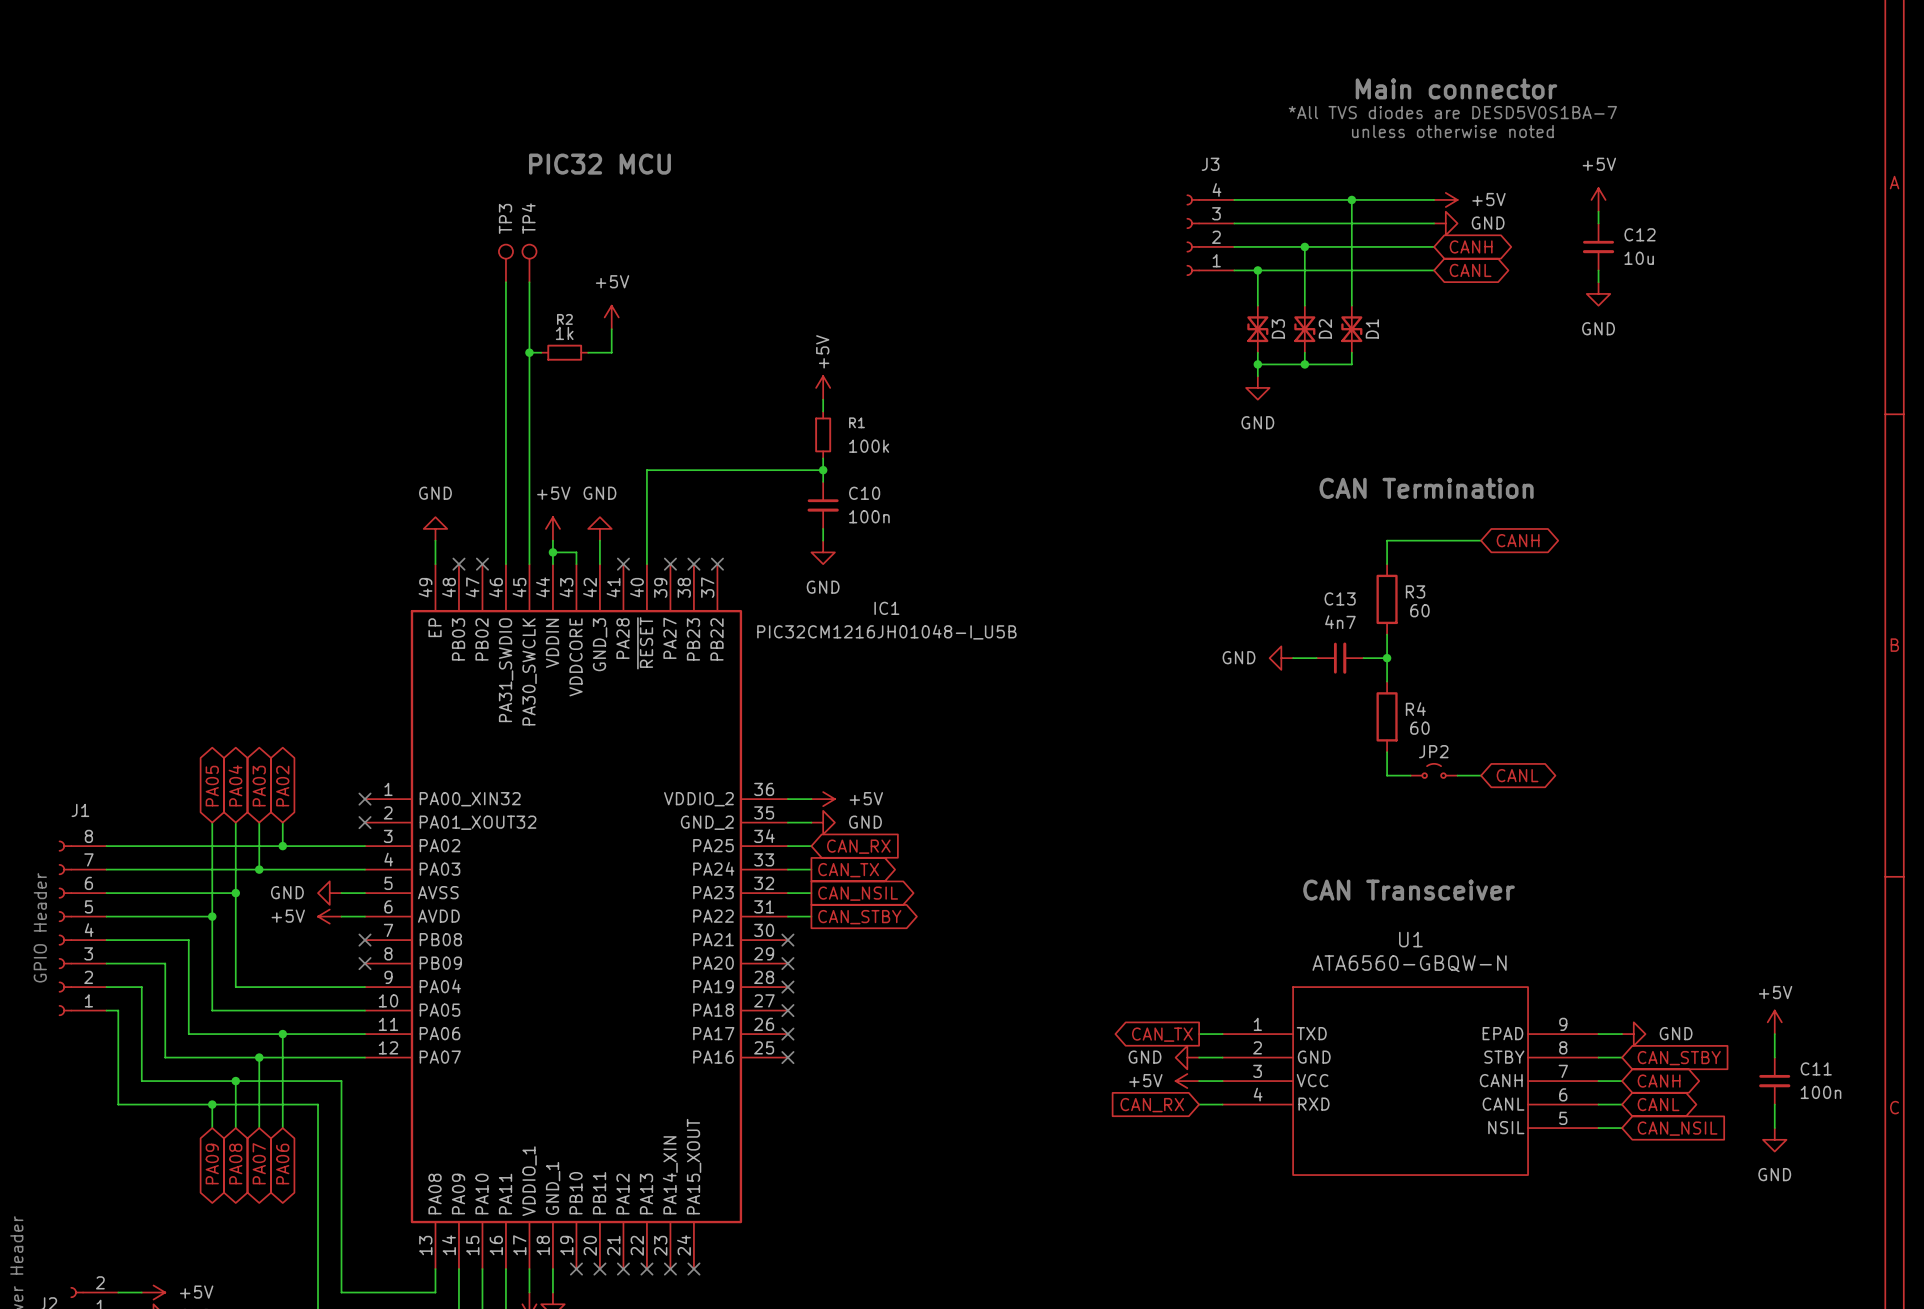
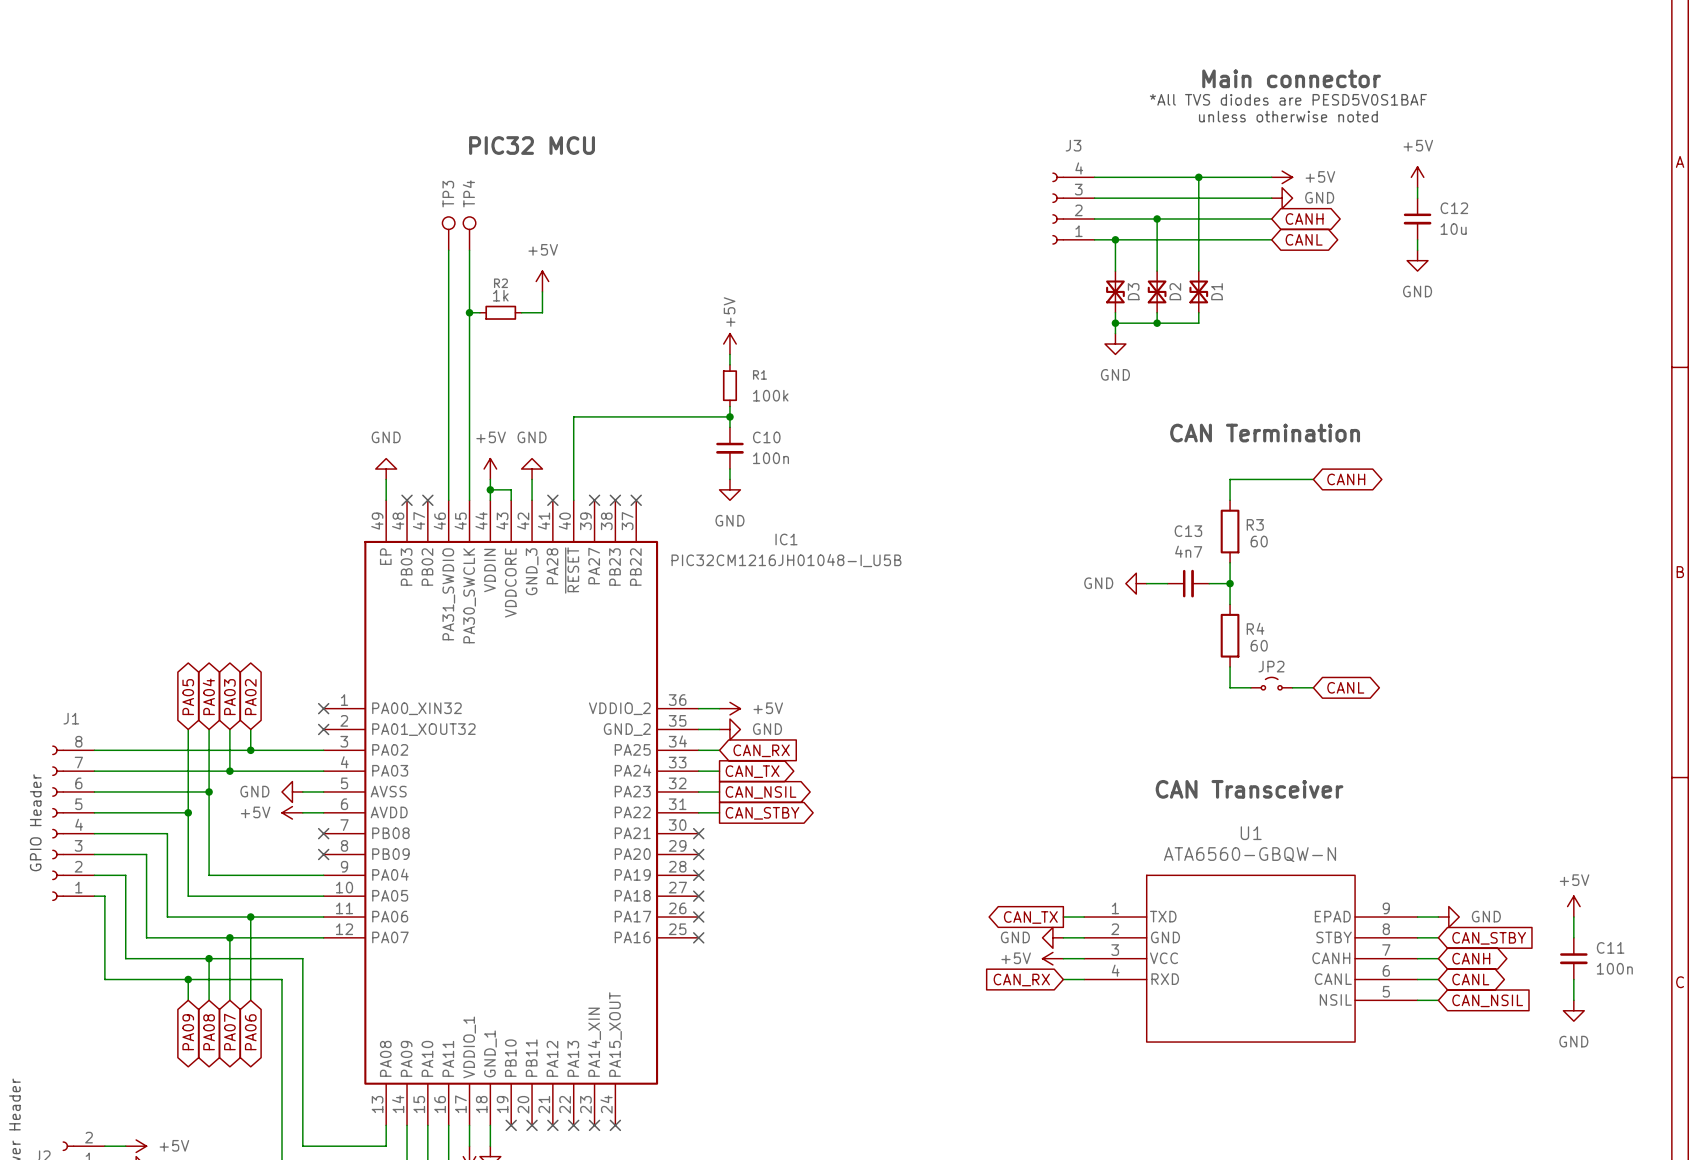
text: *All TVS diodes are DESD5V0S1BA-7 (1452, 112) -> *All TVS diodes are PESD5V0S1BAF (1288, 99)

